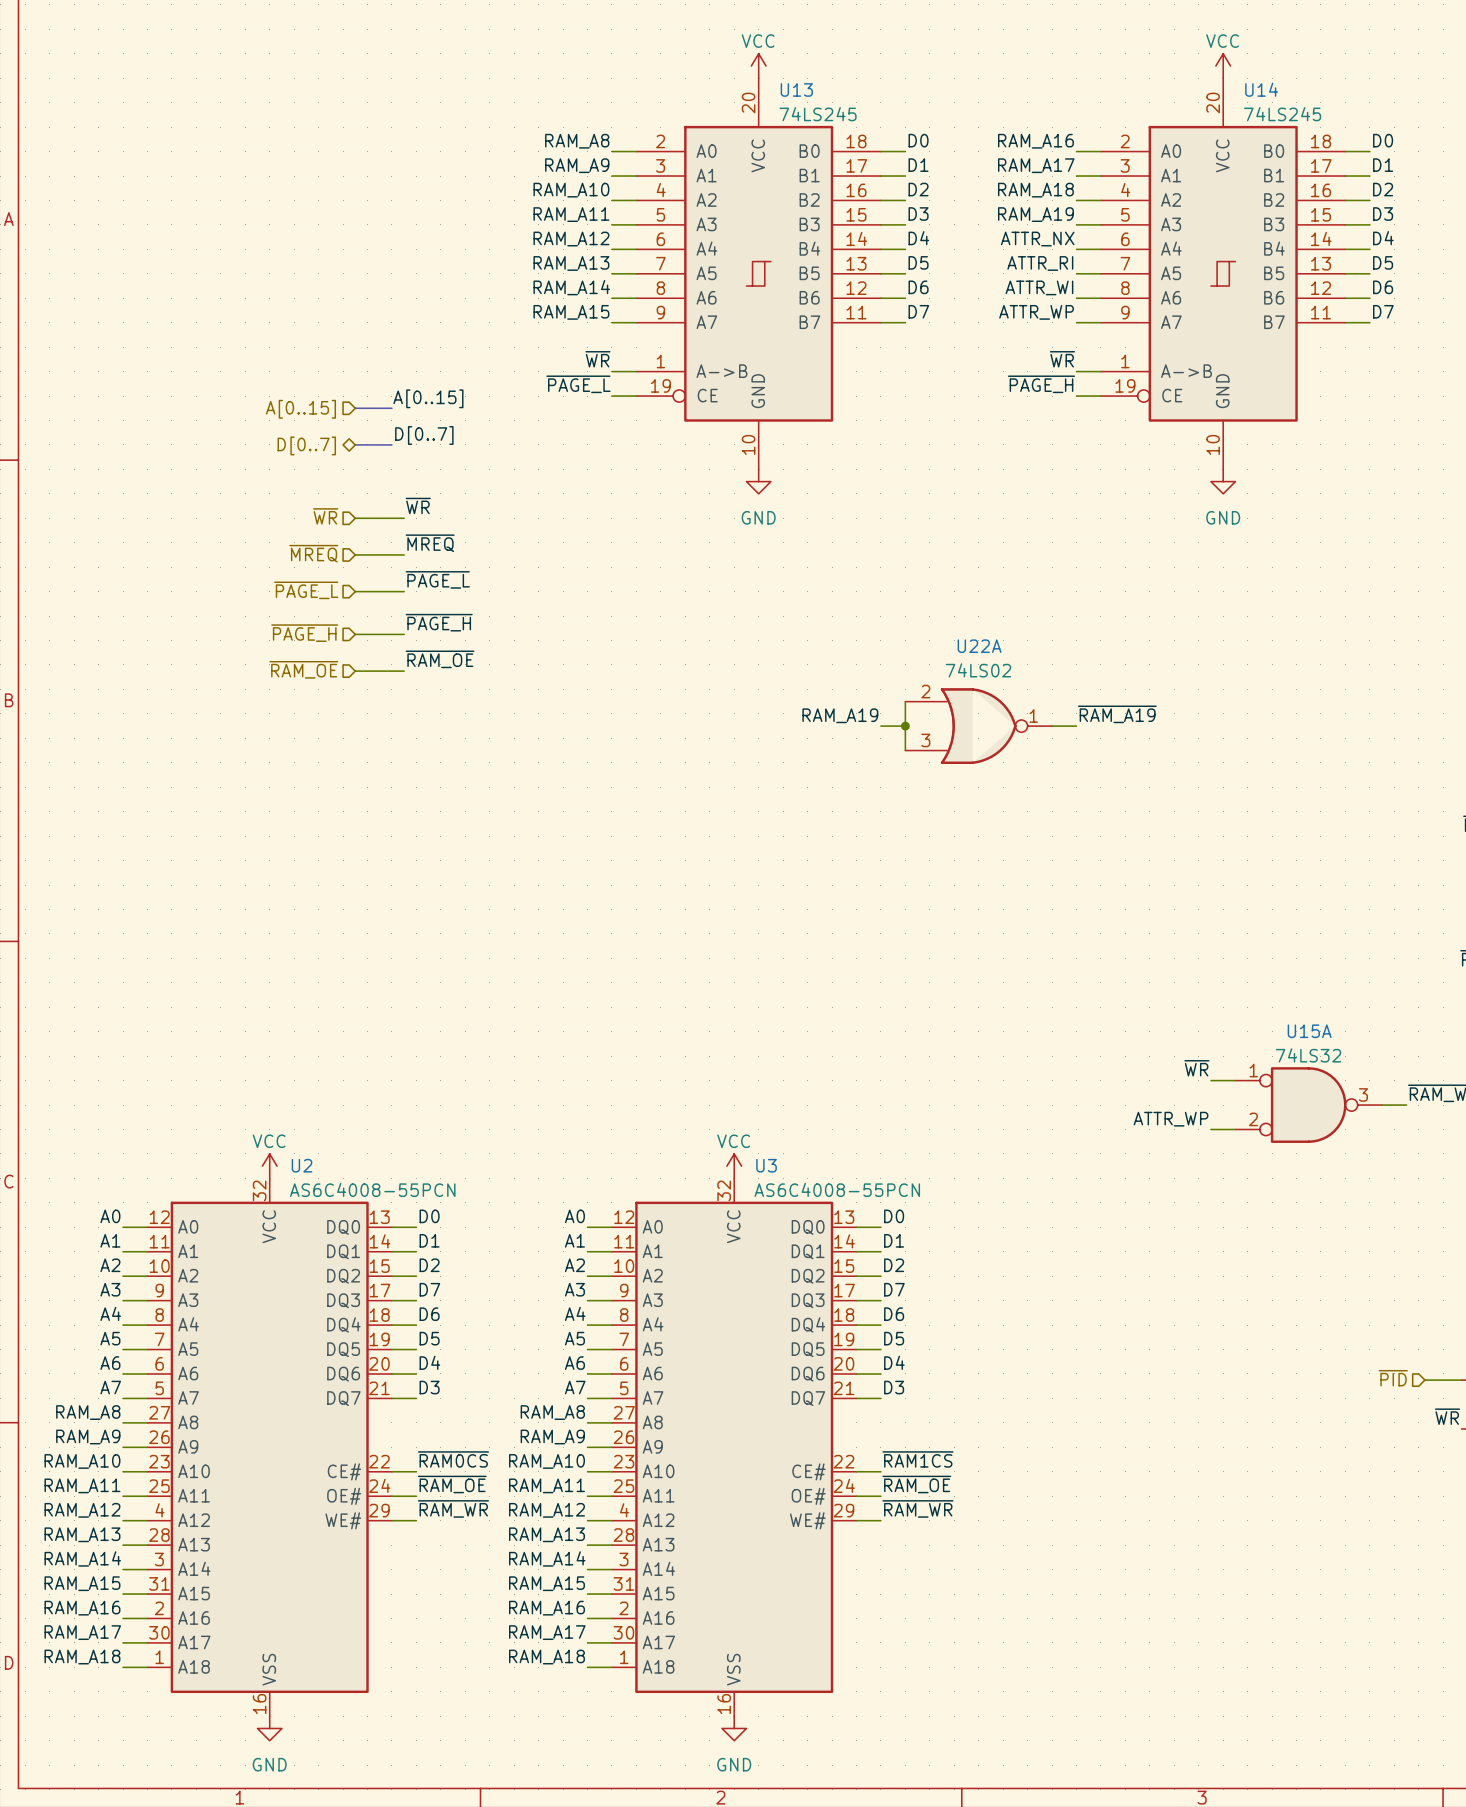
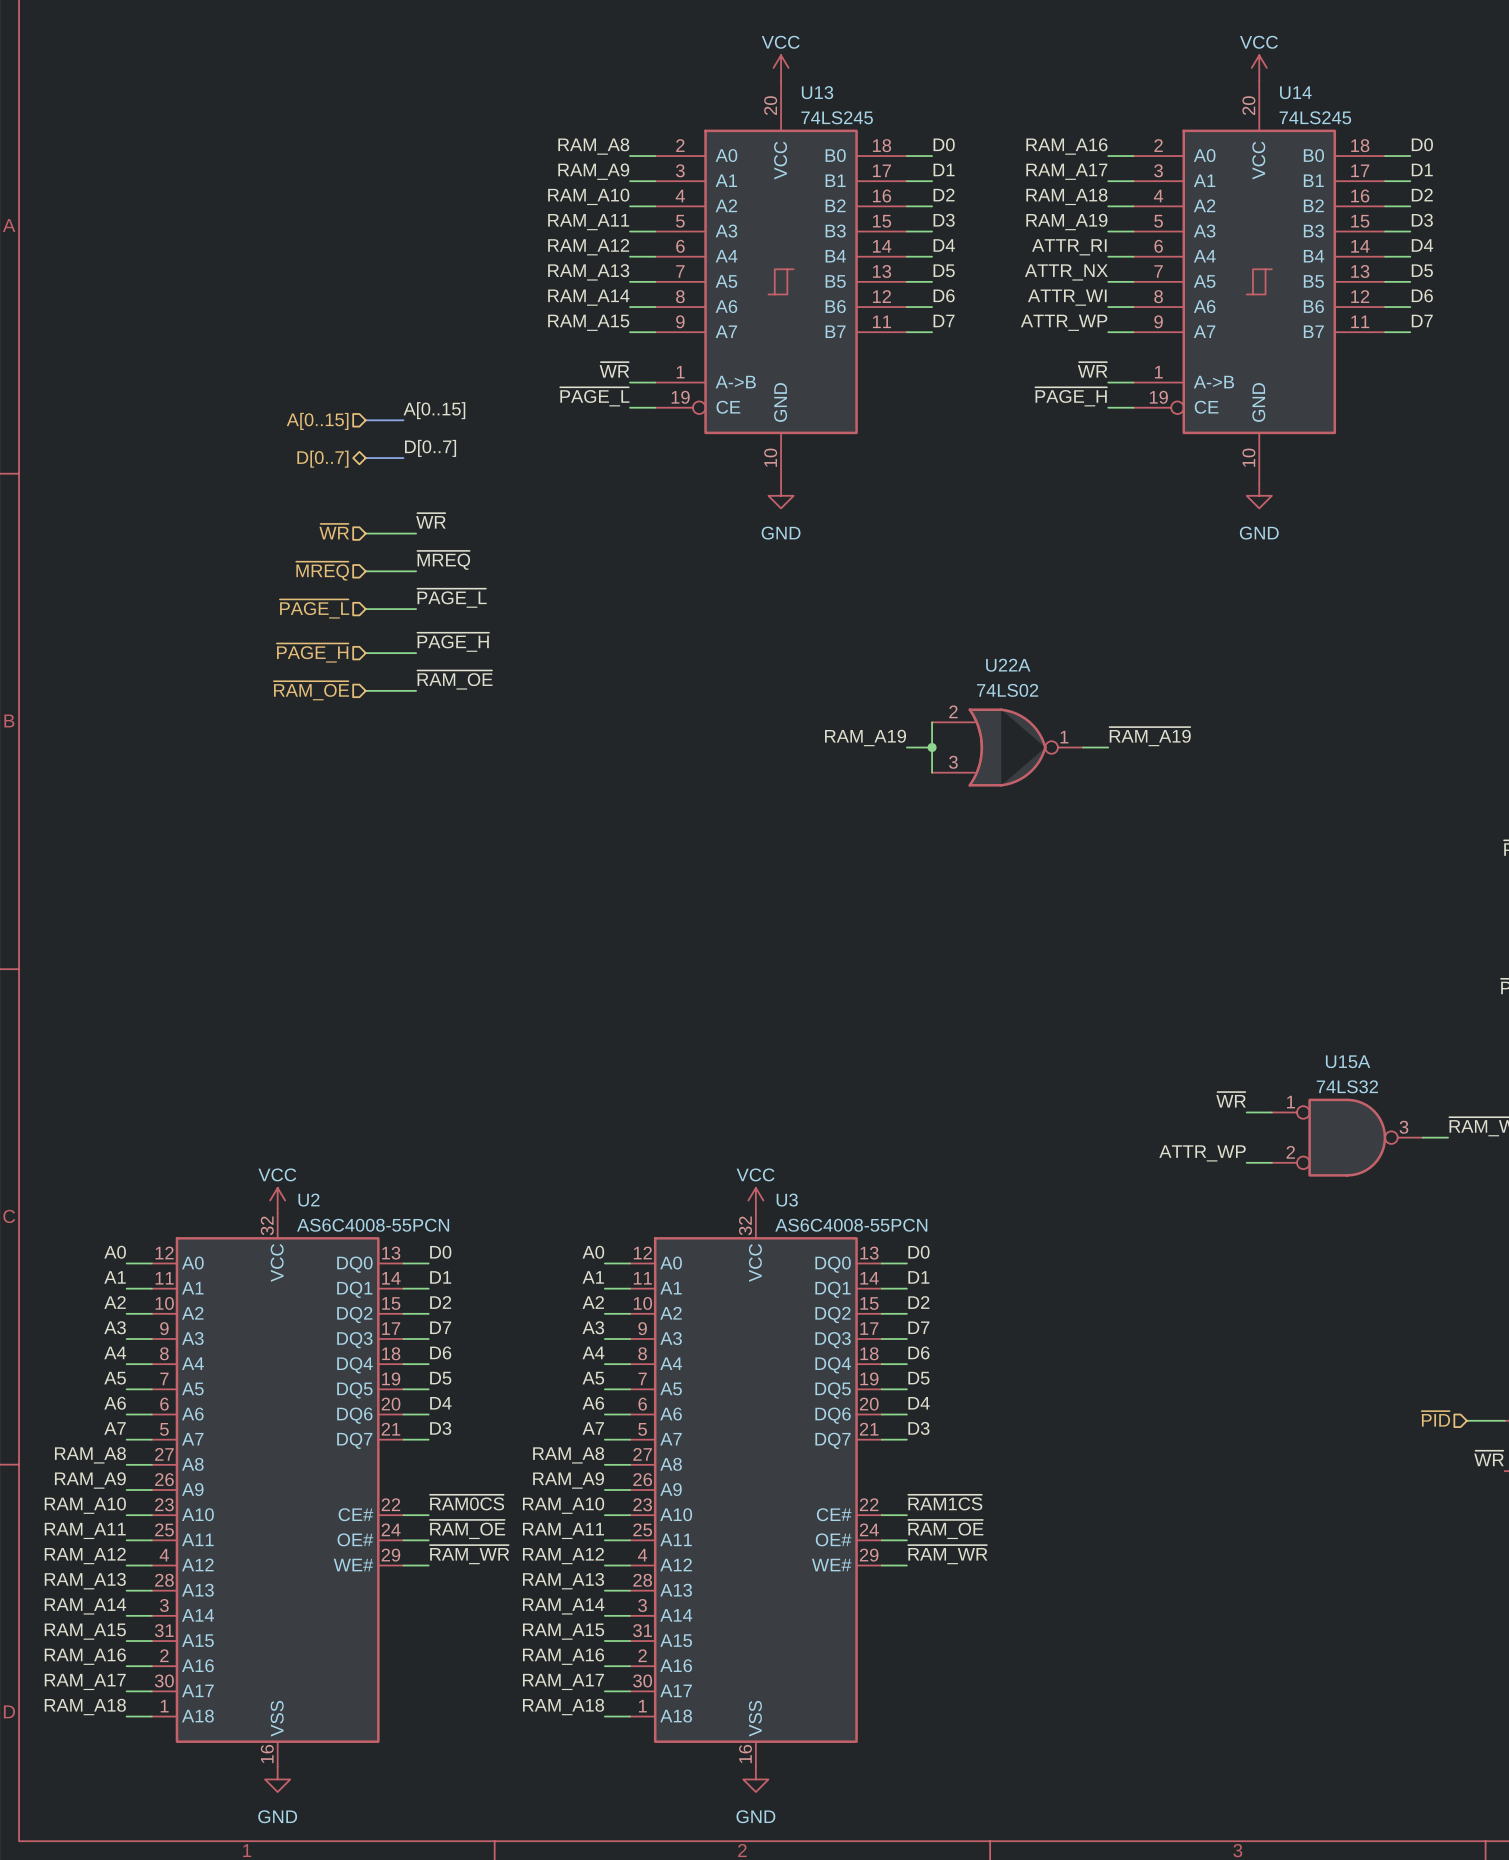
label: ATTR_NX (1037, 239) -> ATTR_RI (1069, 247)
label: ATTR_RI (1040, 263) -> ATTR_NX (1066, 272)

